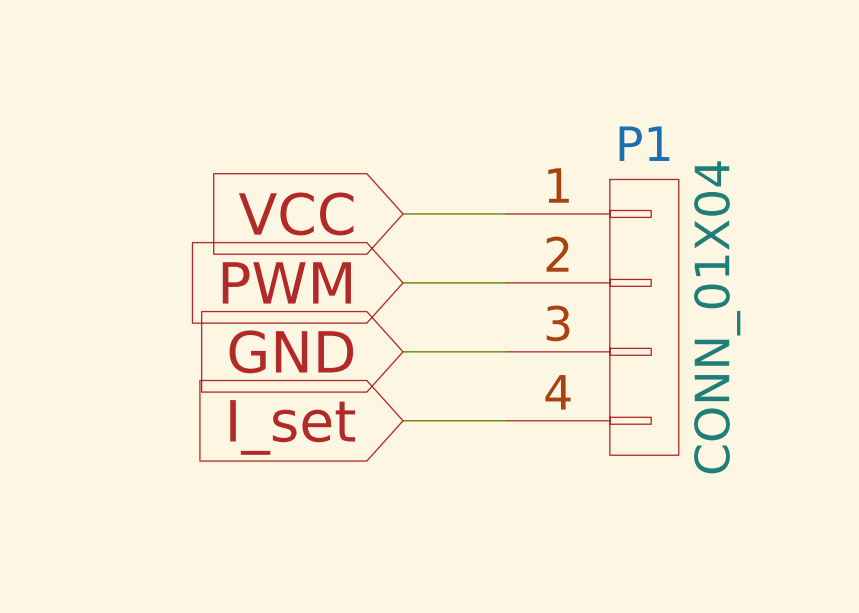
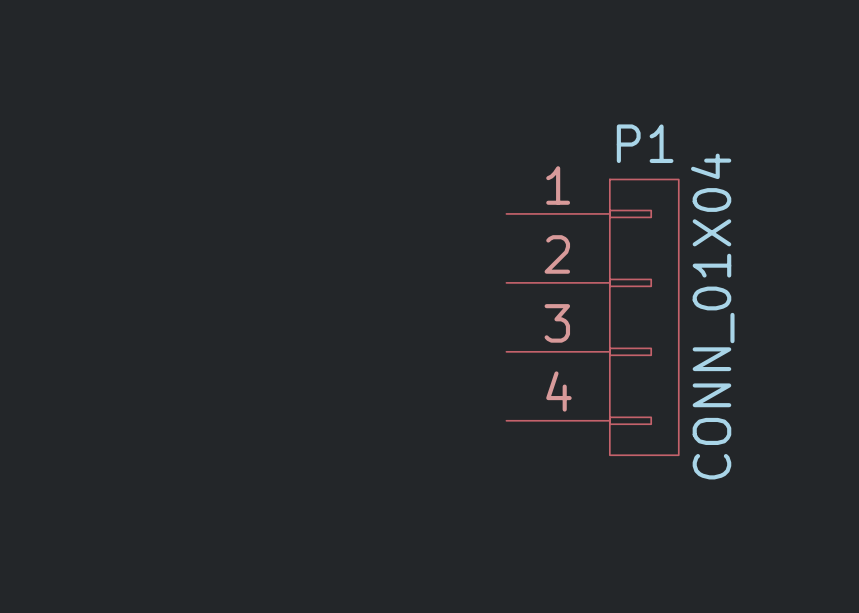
global label: VCC (296, 213) -> none
wire: (403, 213) (506, 213) -> none
global label: PWM (286, 282) -> none
wire: (403, 282) (506, 282) -> none
global label: GND (291, 351) -> none
wire: (403, 351) (506, 351) -> none
wire: (403, 420) (506, 420) -> none
global label: I_set (292, 427) -> none

